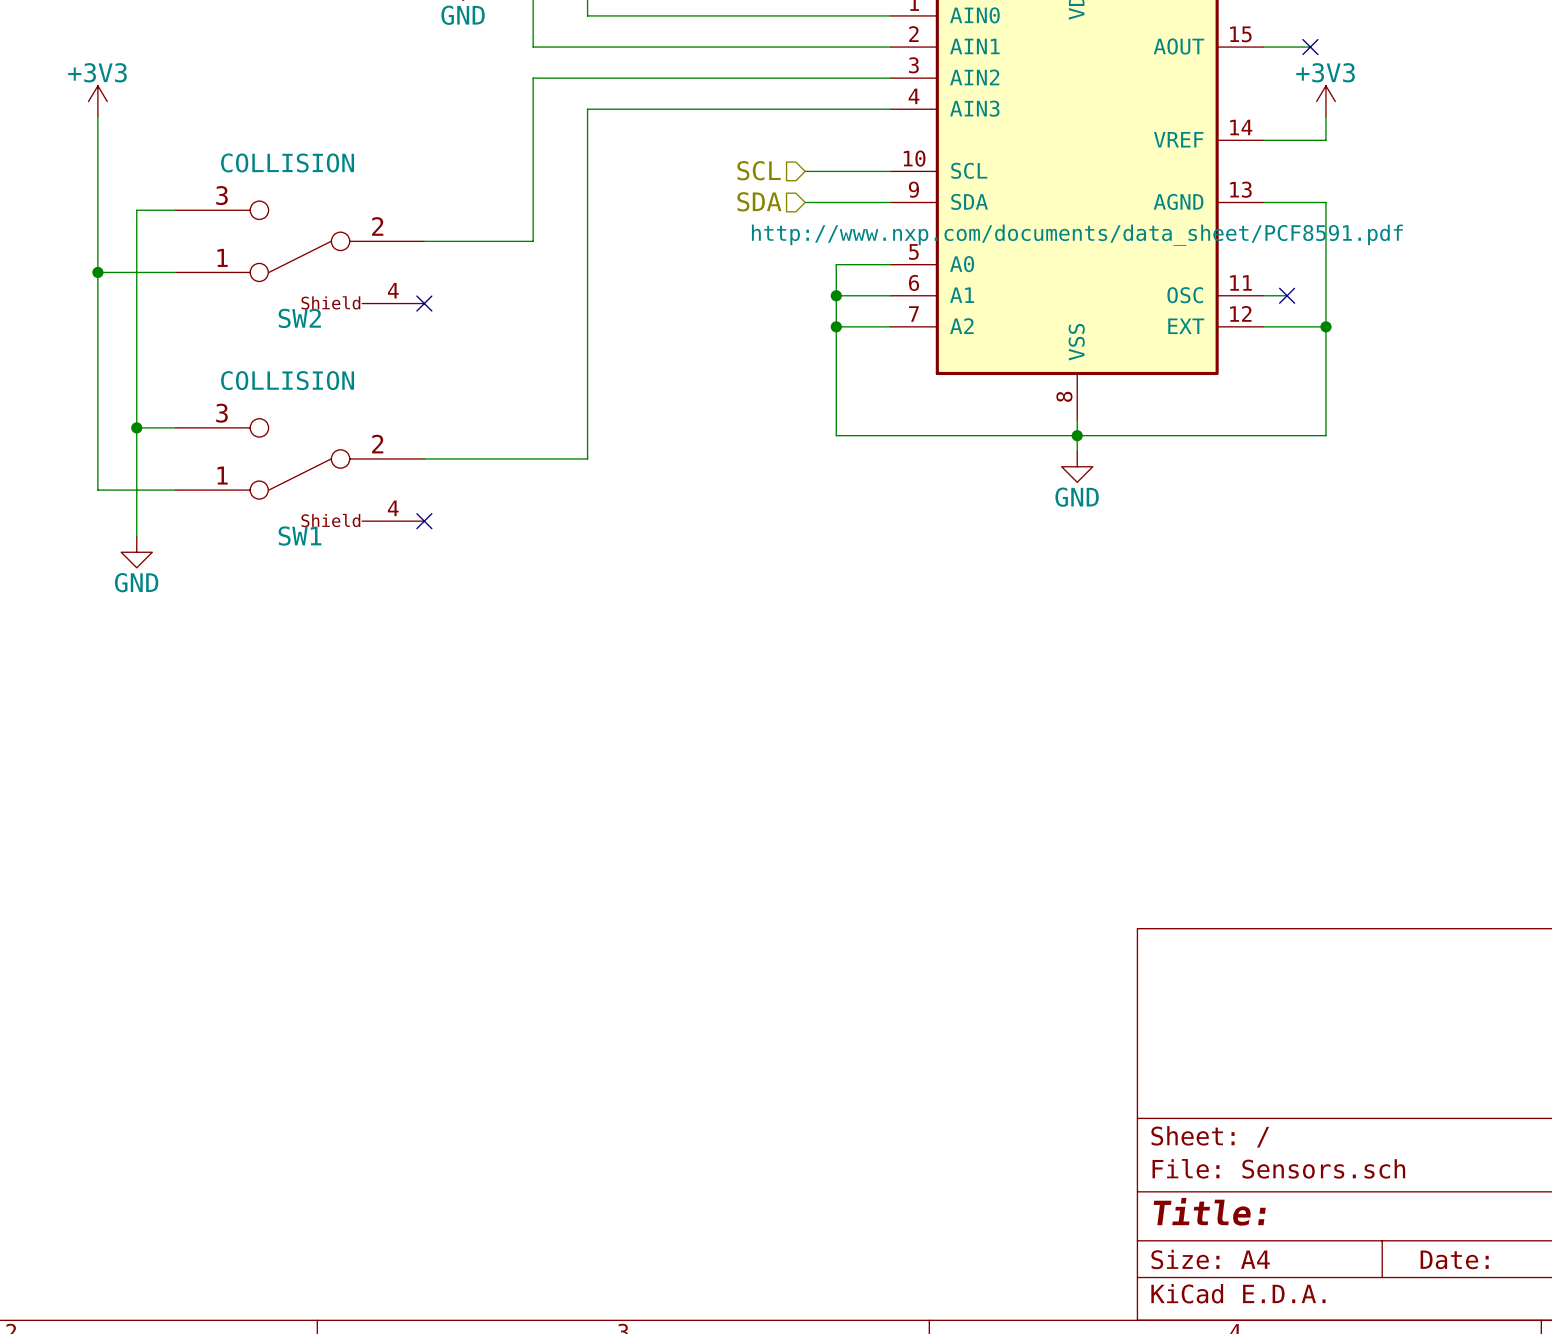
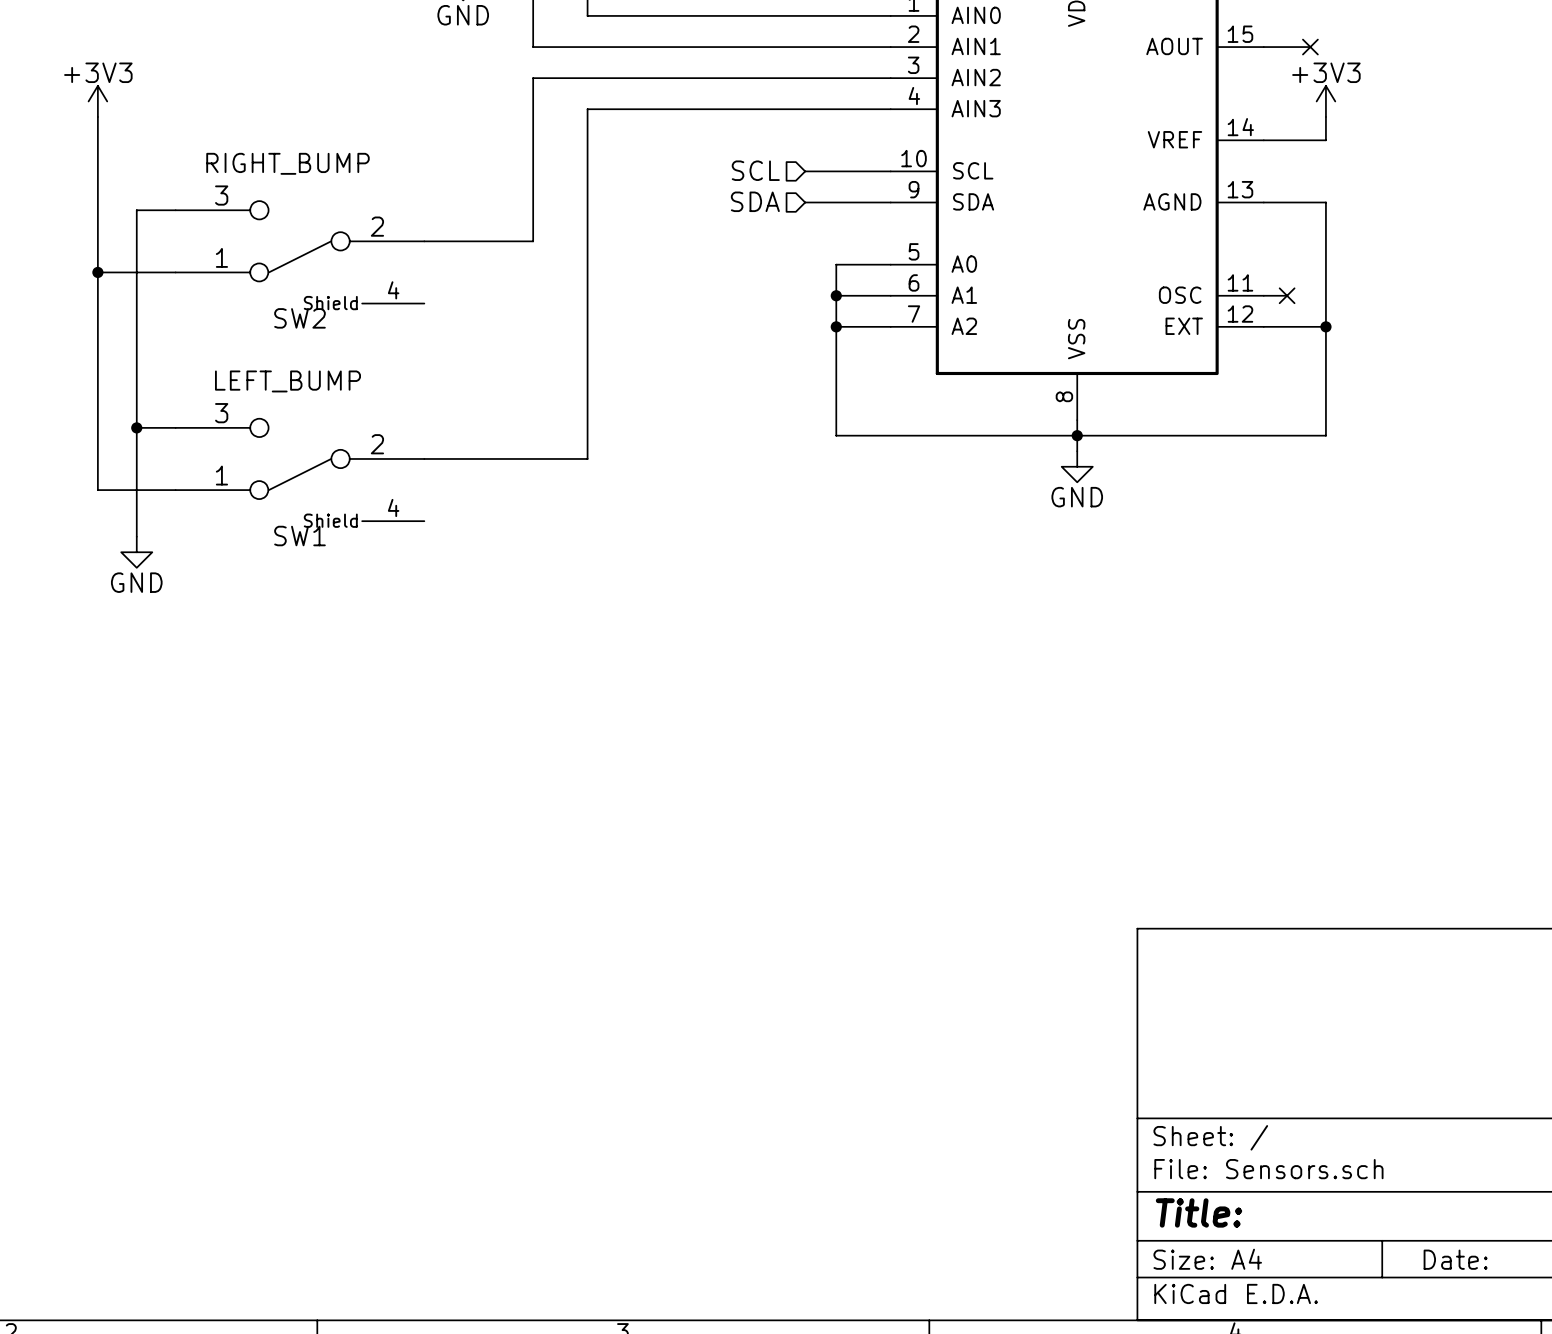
SW2 value: COLLISION (287, 162) -> RIGHT_BUMP (287, 163)
part text: http://www.nxp.com/documents/data_sheet/PCF8591.pdf (1077, 235) -> none
no-connect mark: (424, 303) -> none
SW1 value: COLLISION (287, 380) -> LEFT_BUMP (287, 381)
no-connect mark: (424, 521) -> none

